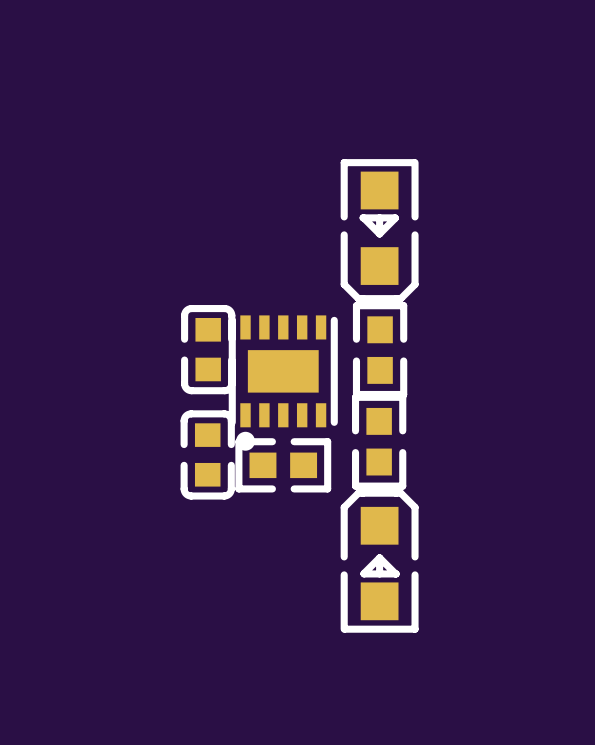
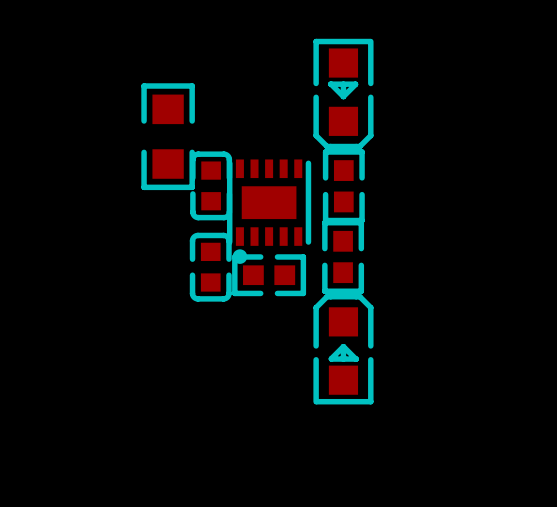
part: none -> (168, 136)

